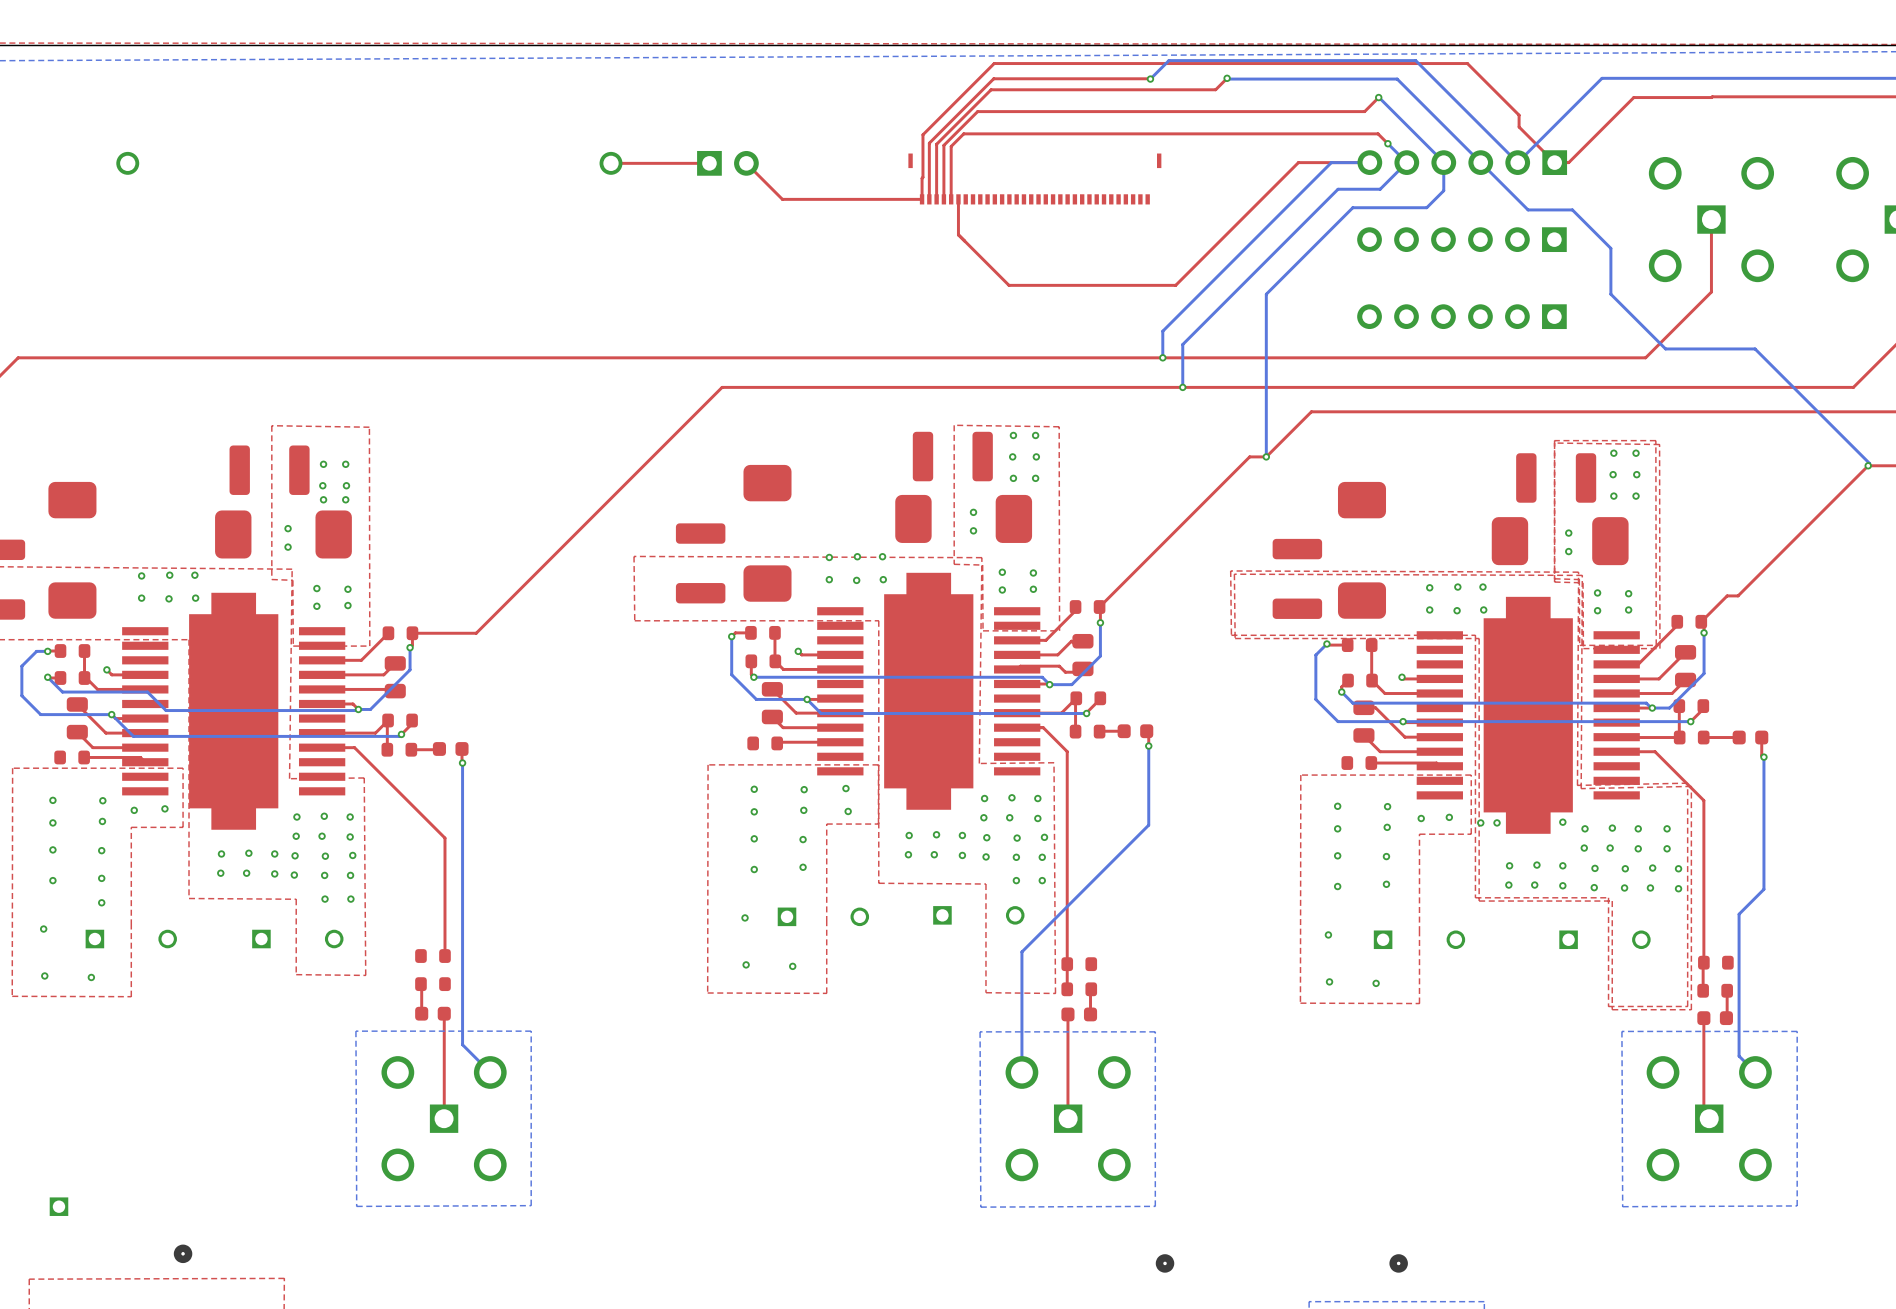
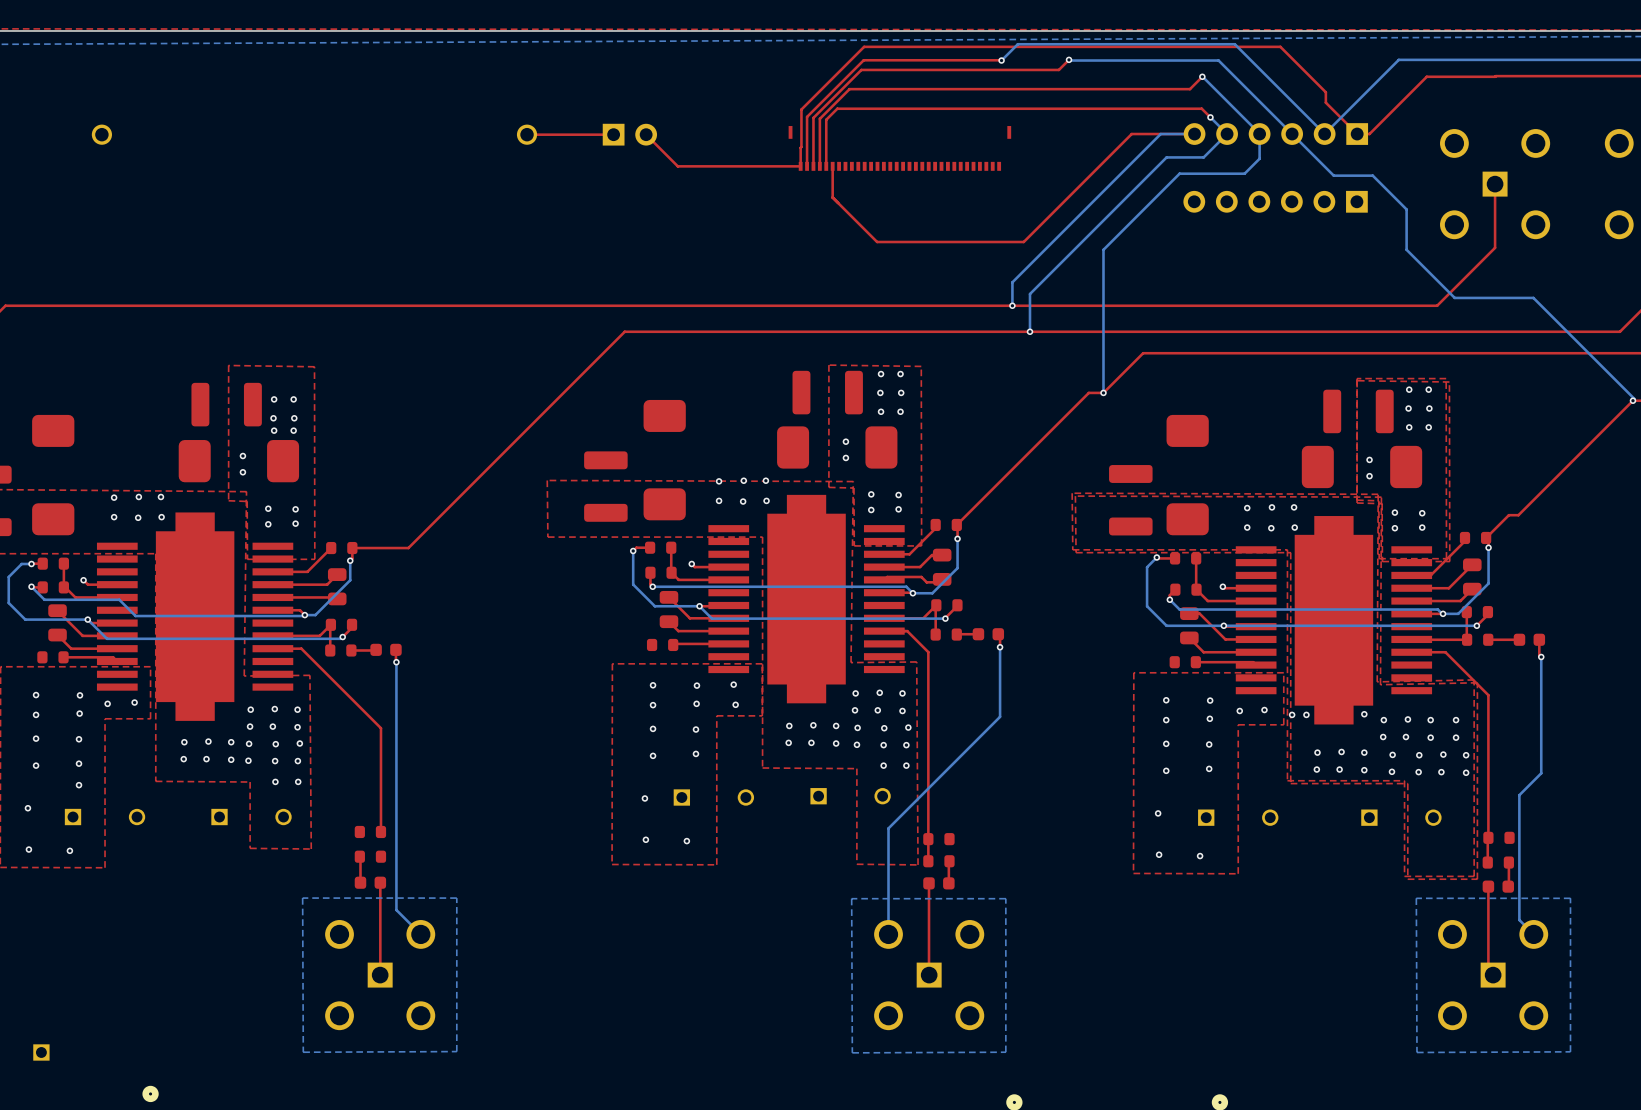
part: (1461, 316) -> none

